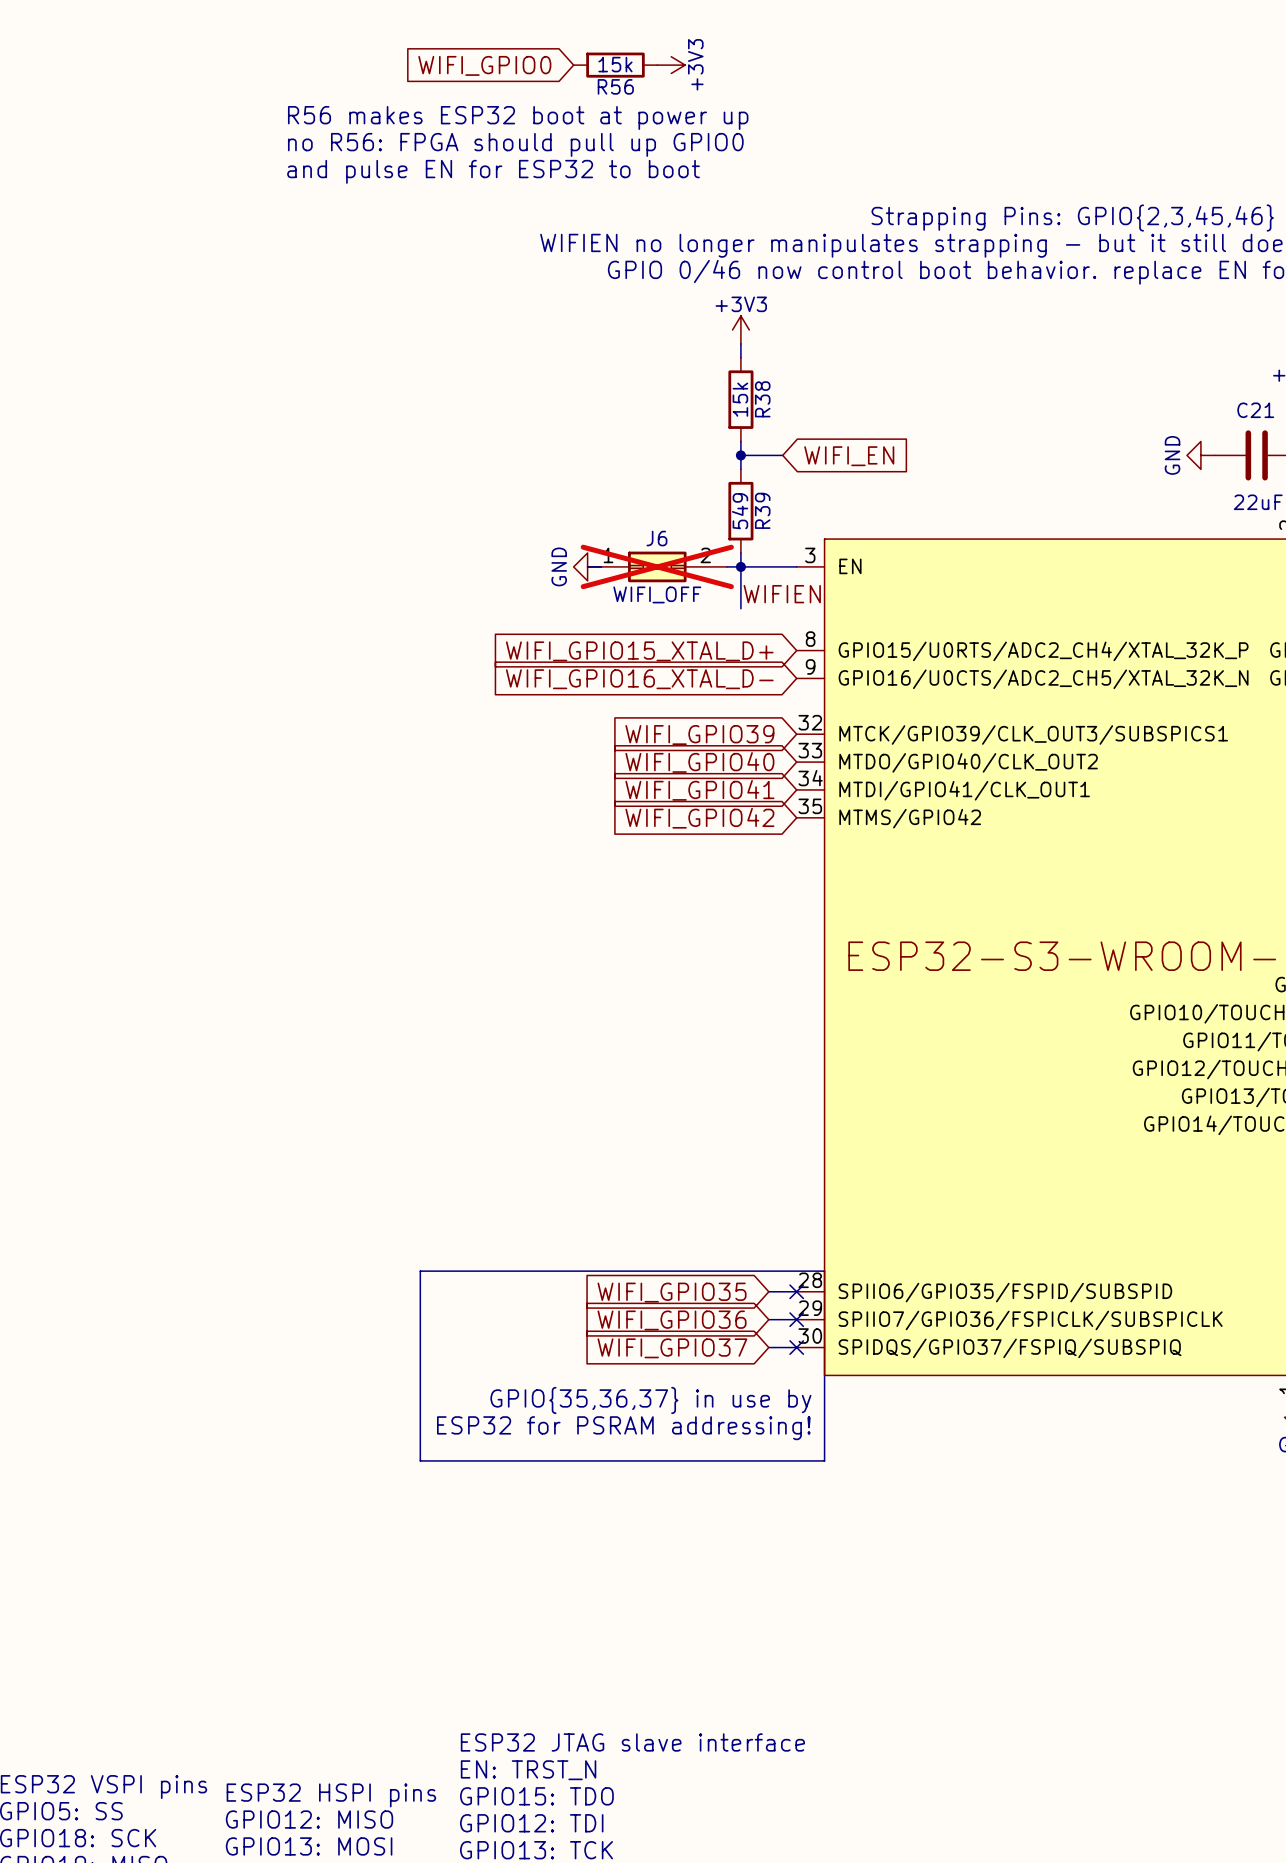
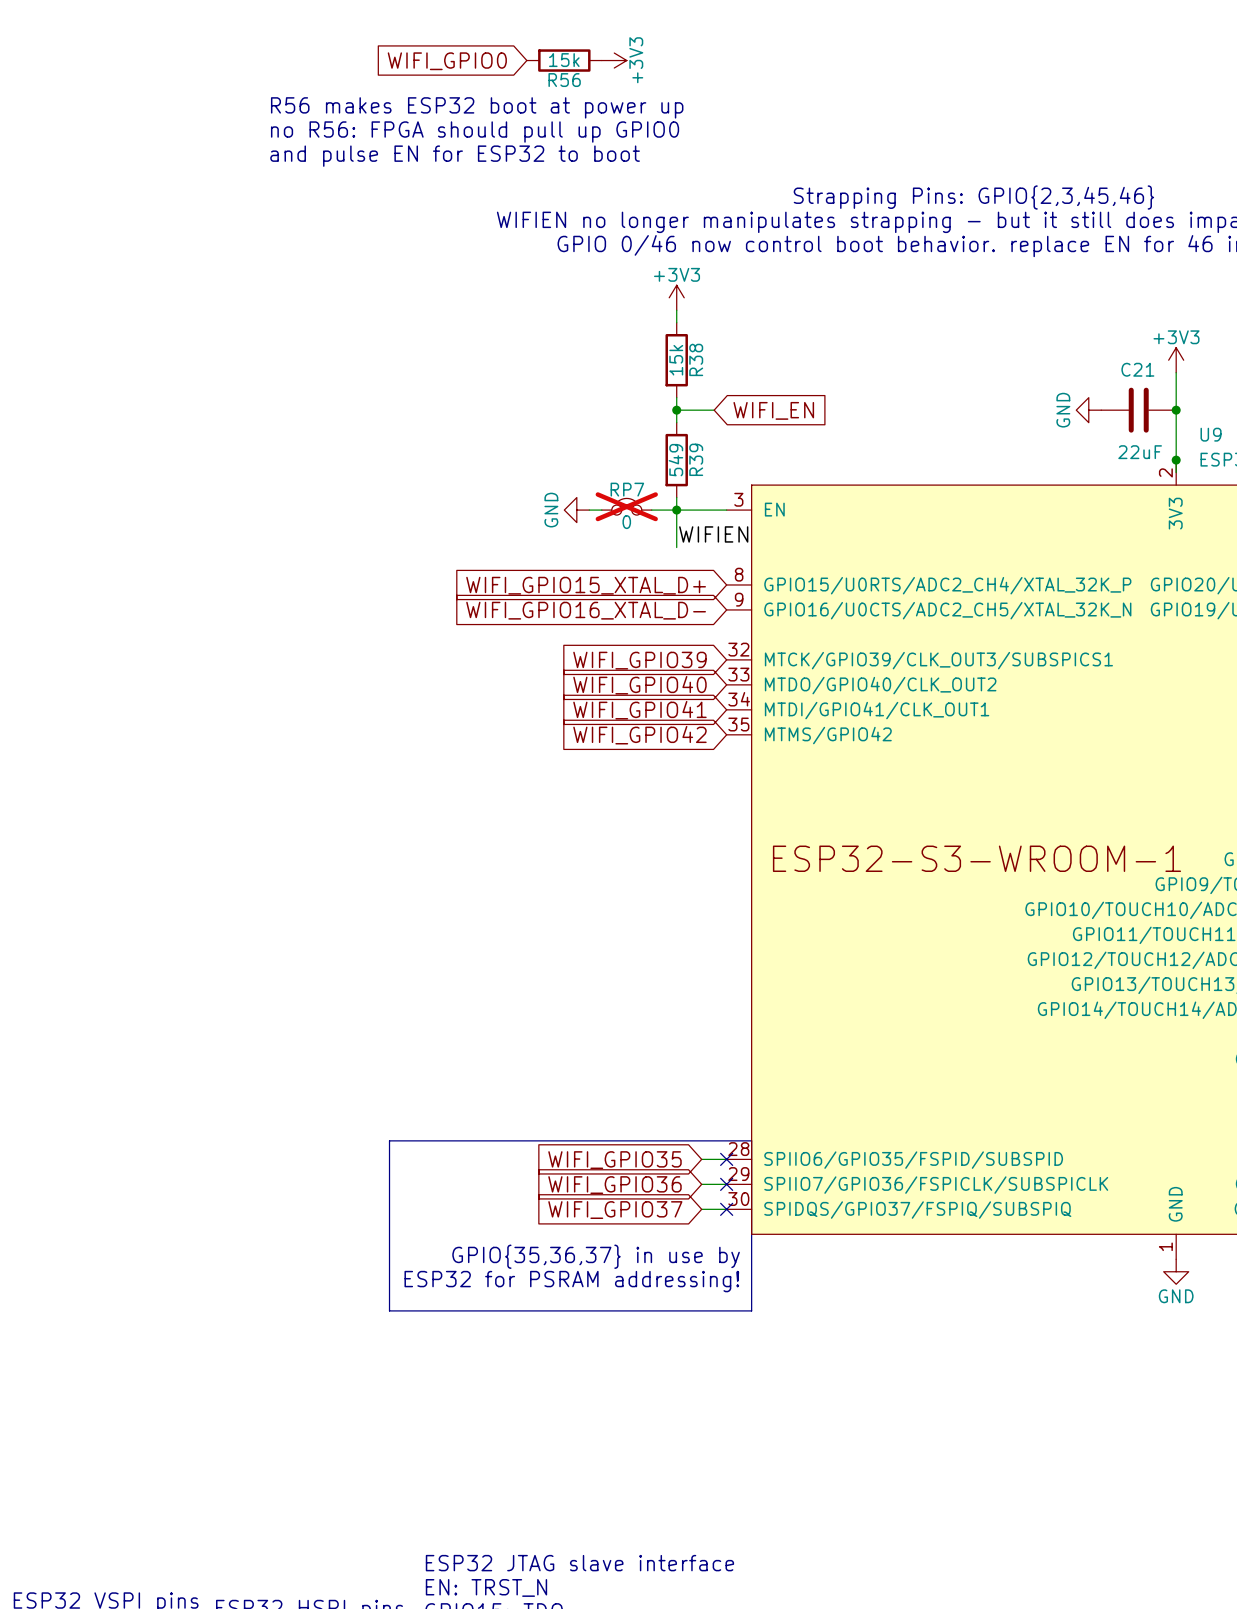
RP7: none -> 0 (626, 506)
power symbol position: GND (587, 566) -> GND (576, 510)
J6: WIFI_OFF (657, 566) -> none

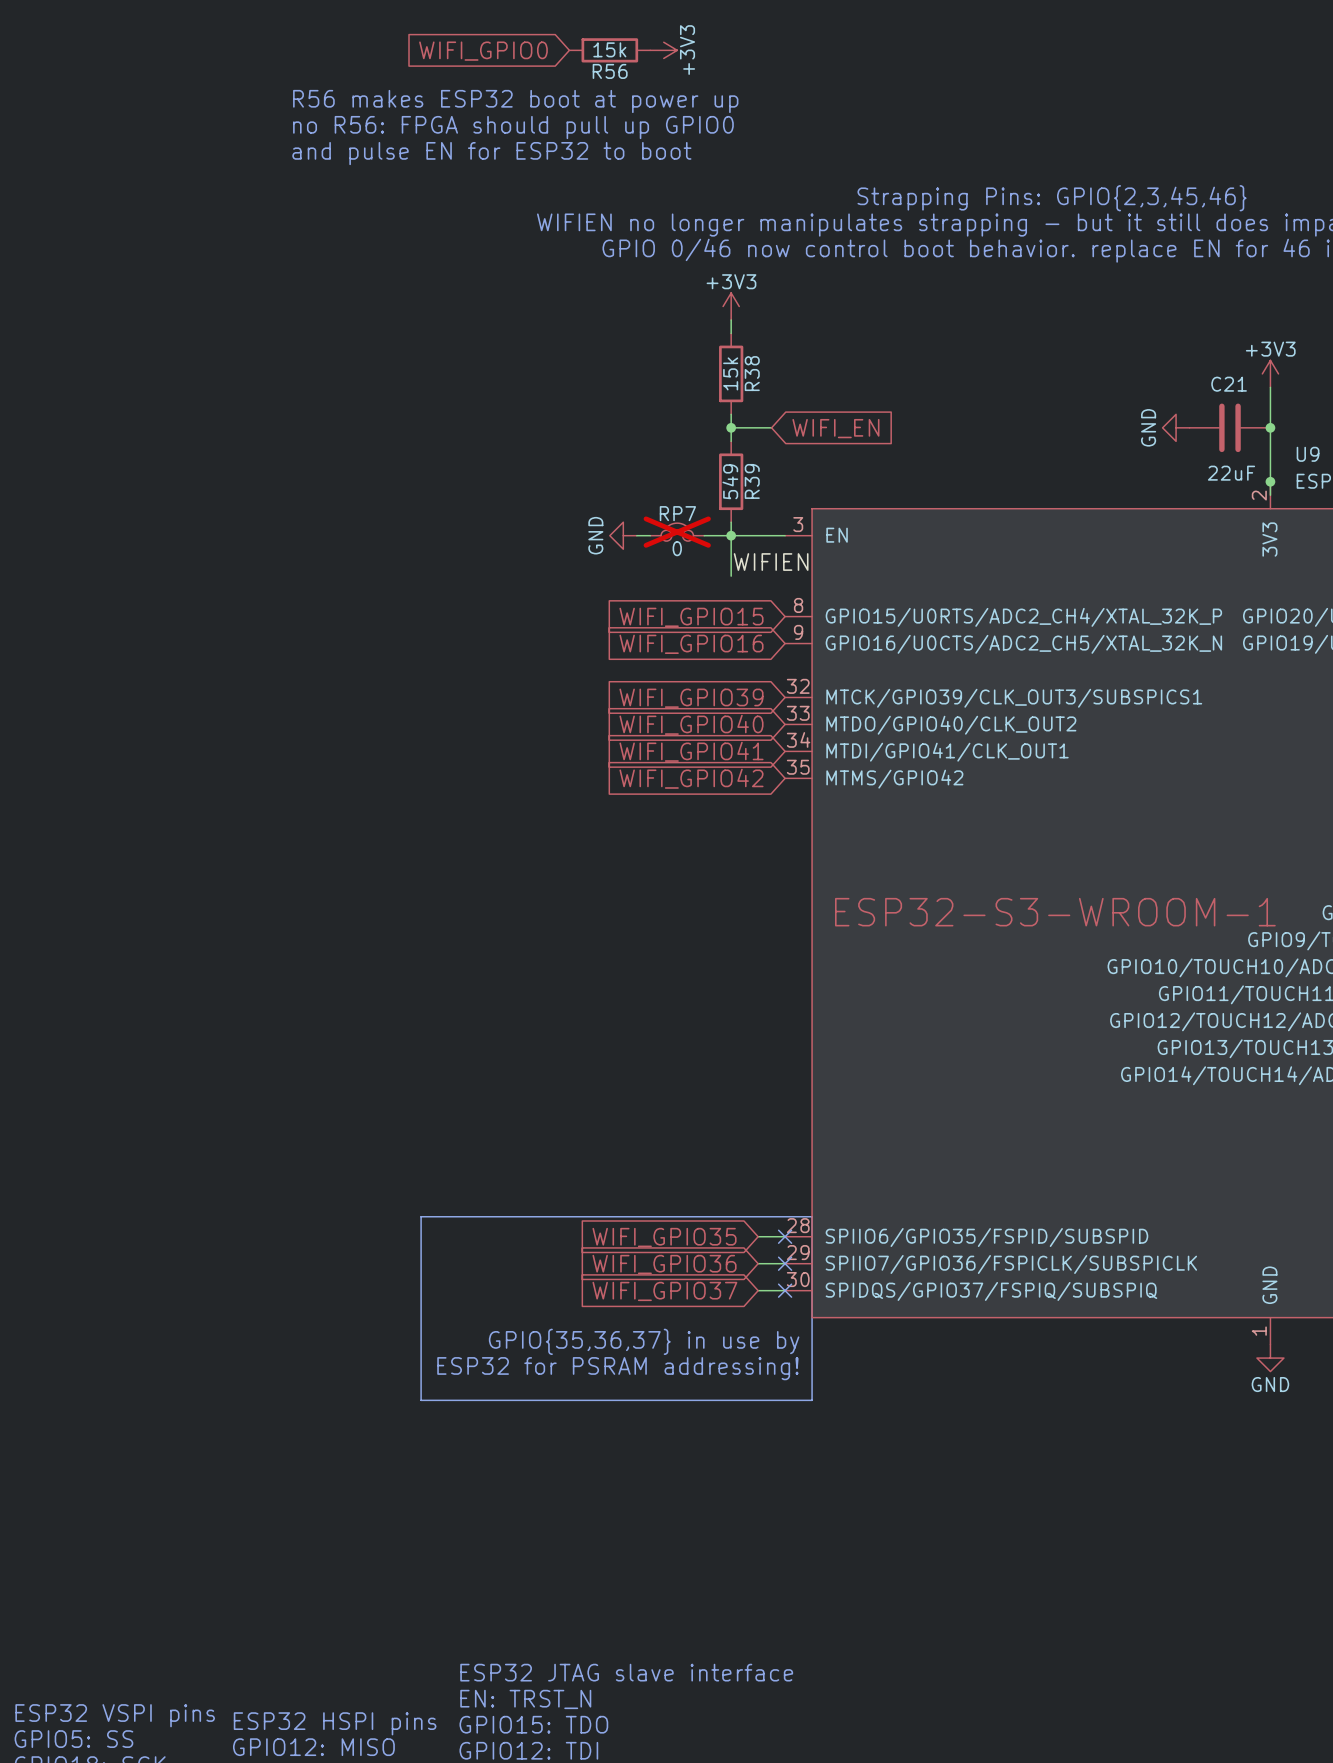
global label: WIFI_GPIO15_XTAL_D+ (586, 585) -> WIFI_GPIO15 (691, 617)
global label: WIFI_GPIO16_XTAL_D- (586, 610) -> WIFI_GPIO16 (691, 644)

